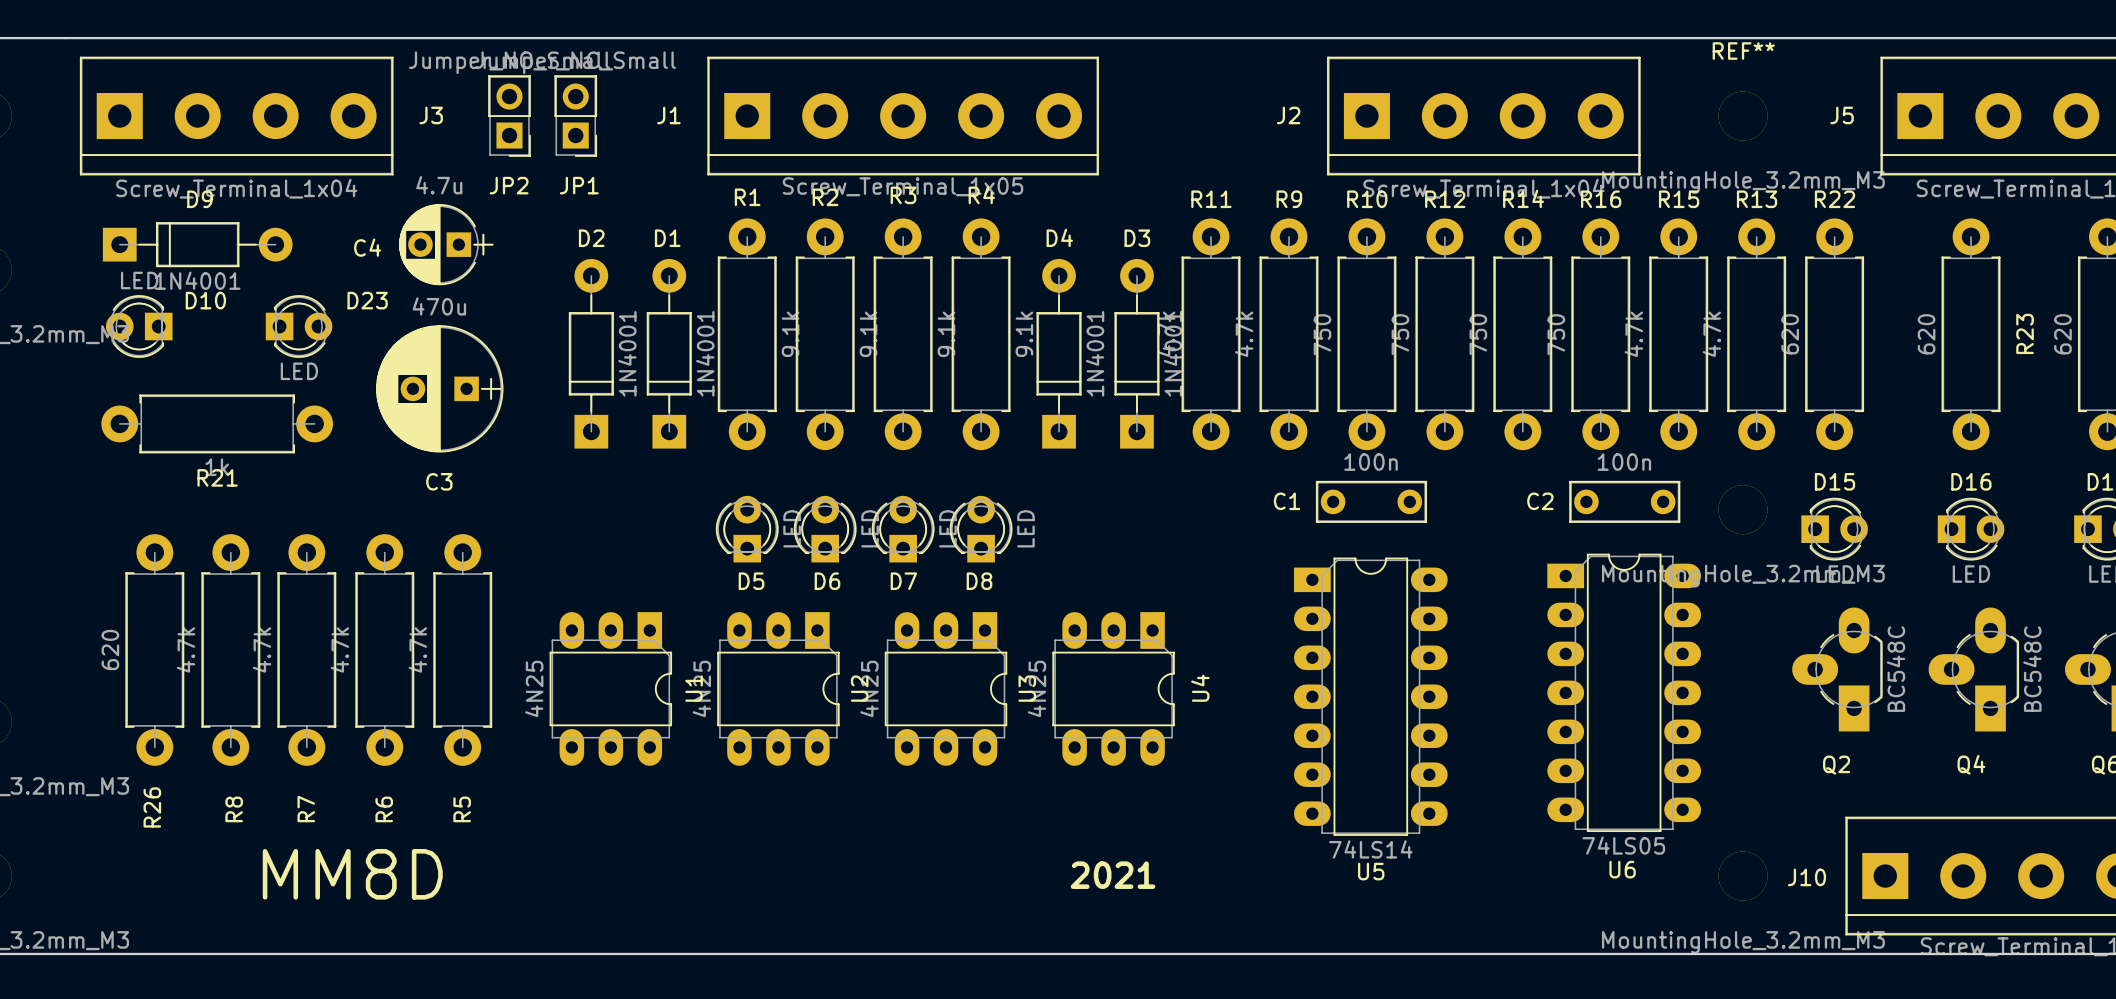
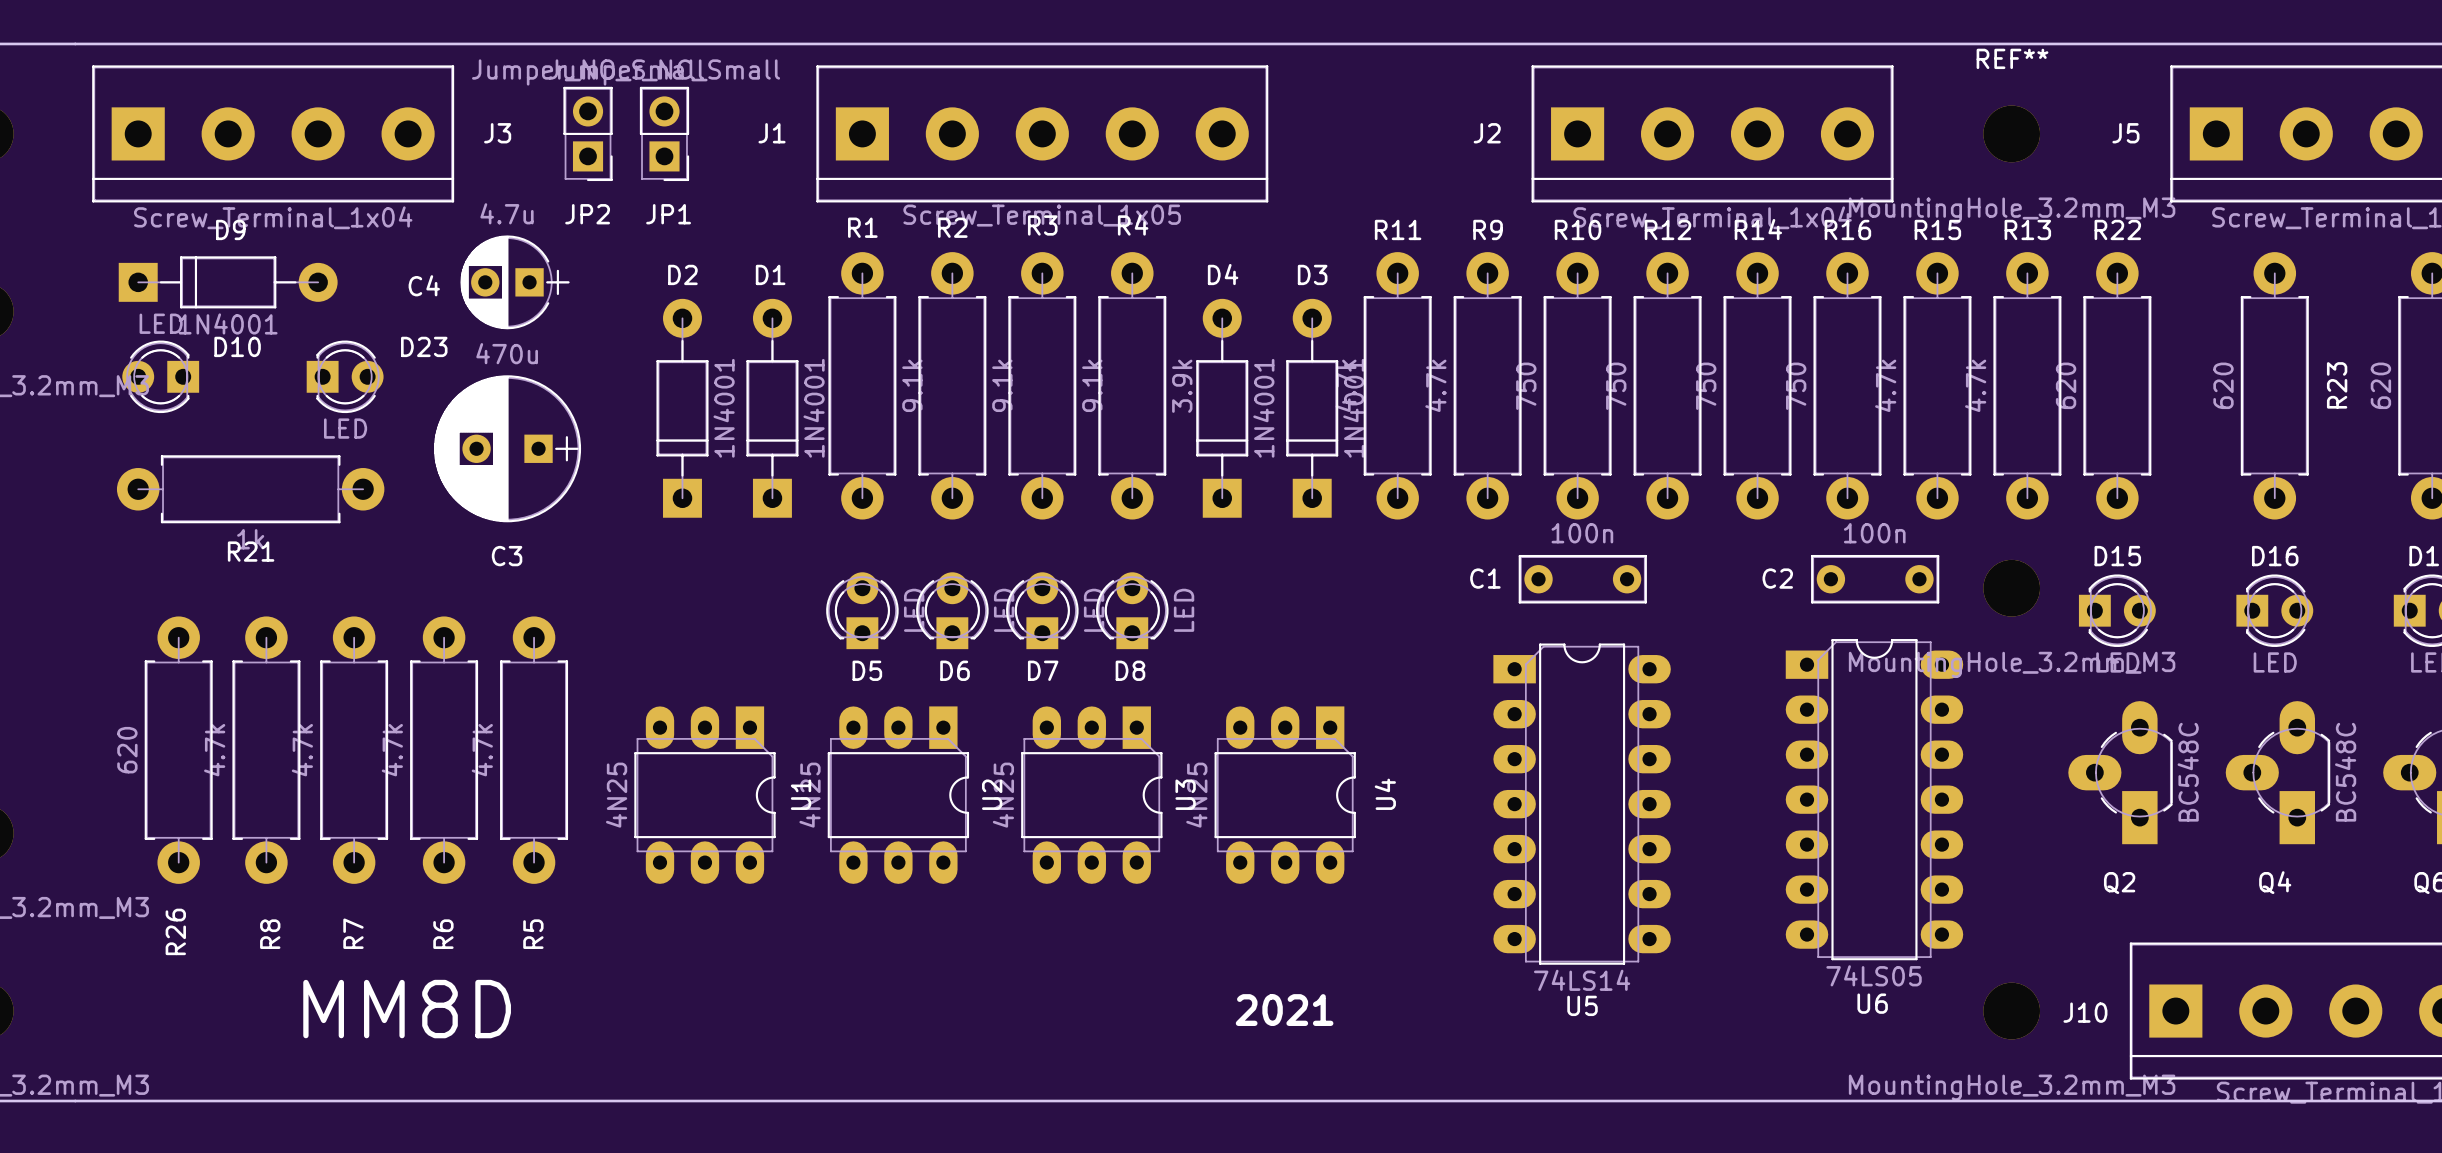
R4 value: 9.1k (1024, 334) -> 3.9k (1182, 386)

